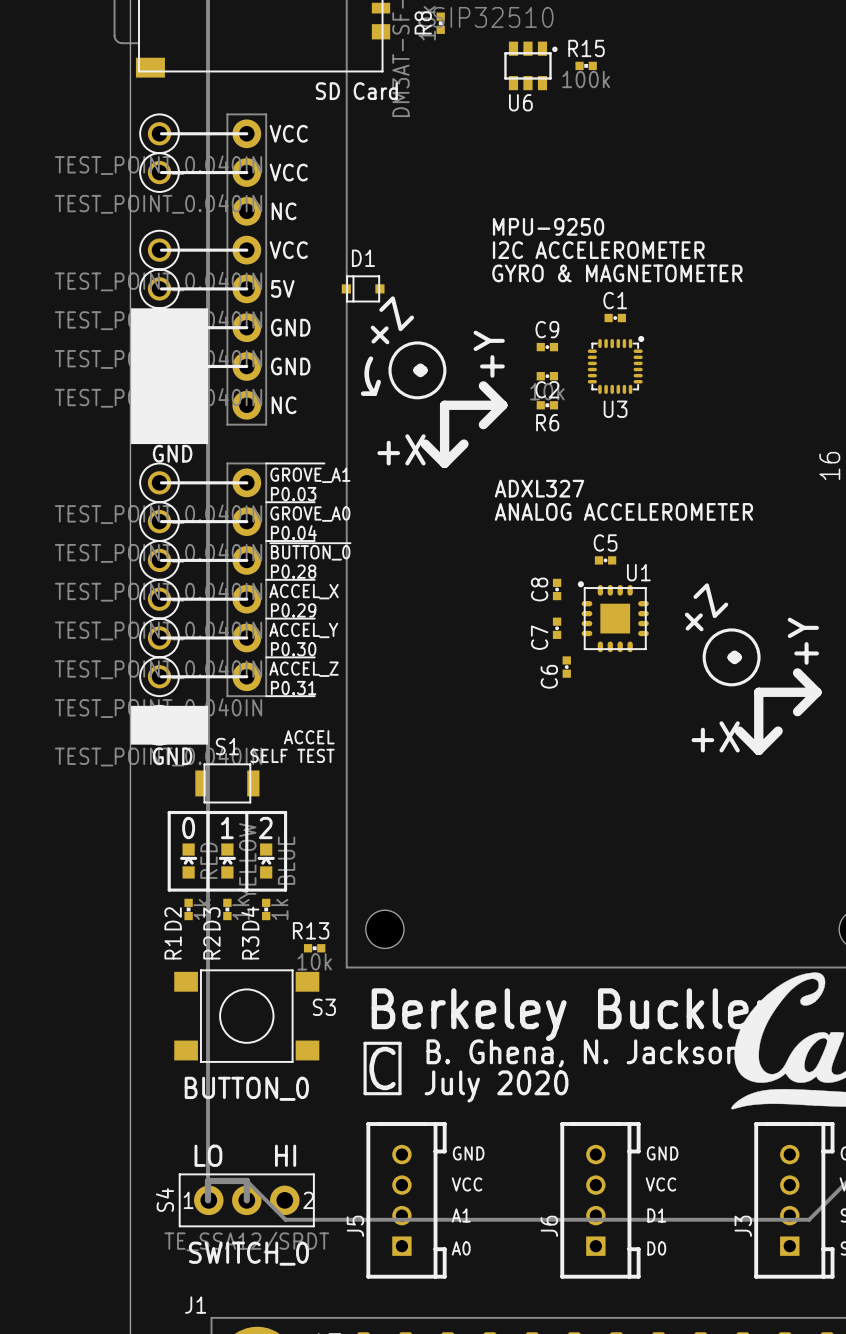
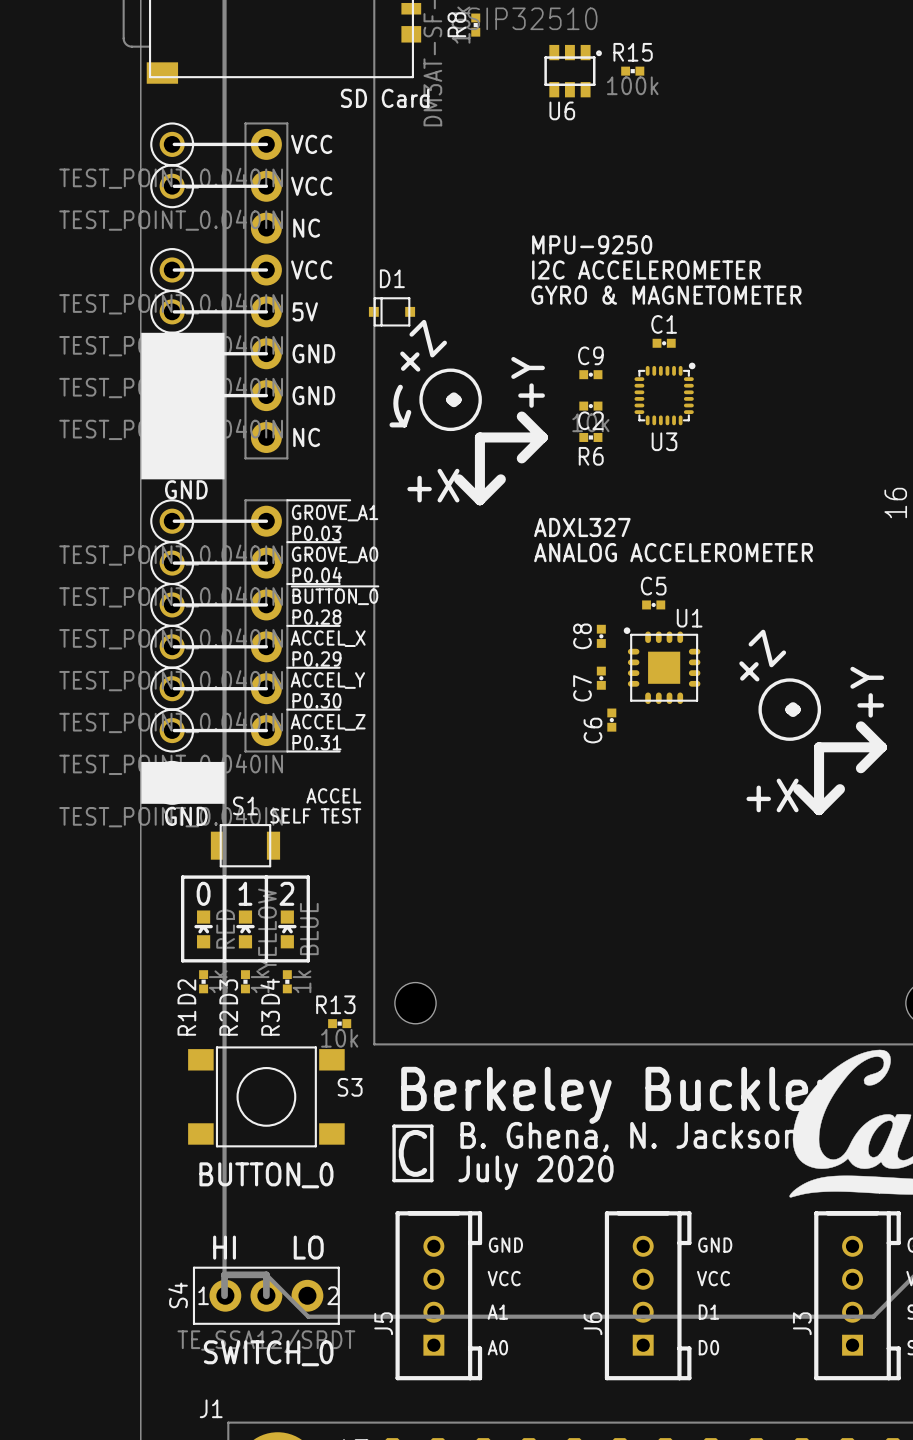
text: LO (208, 1155) -> HI (224, 1247)
text: HI (285, 1155) -> LO (308, 1247)

